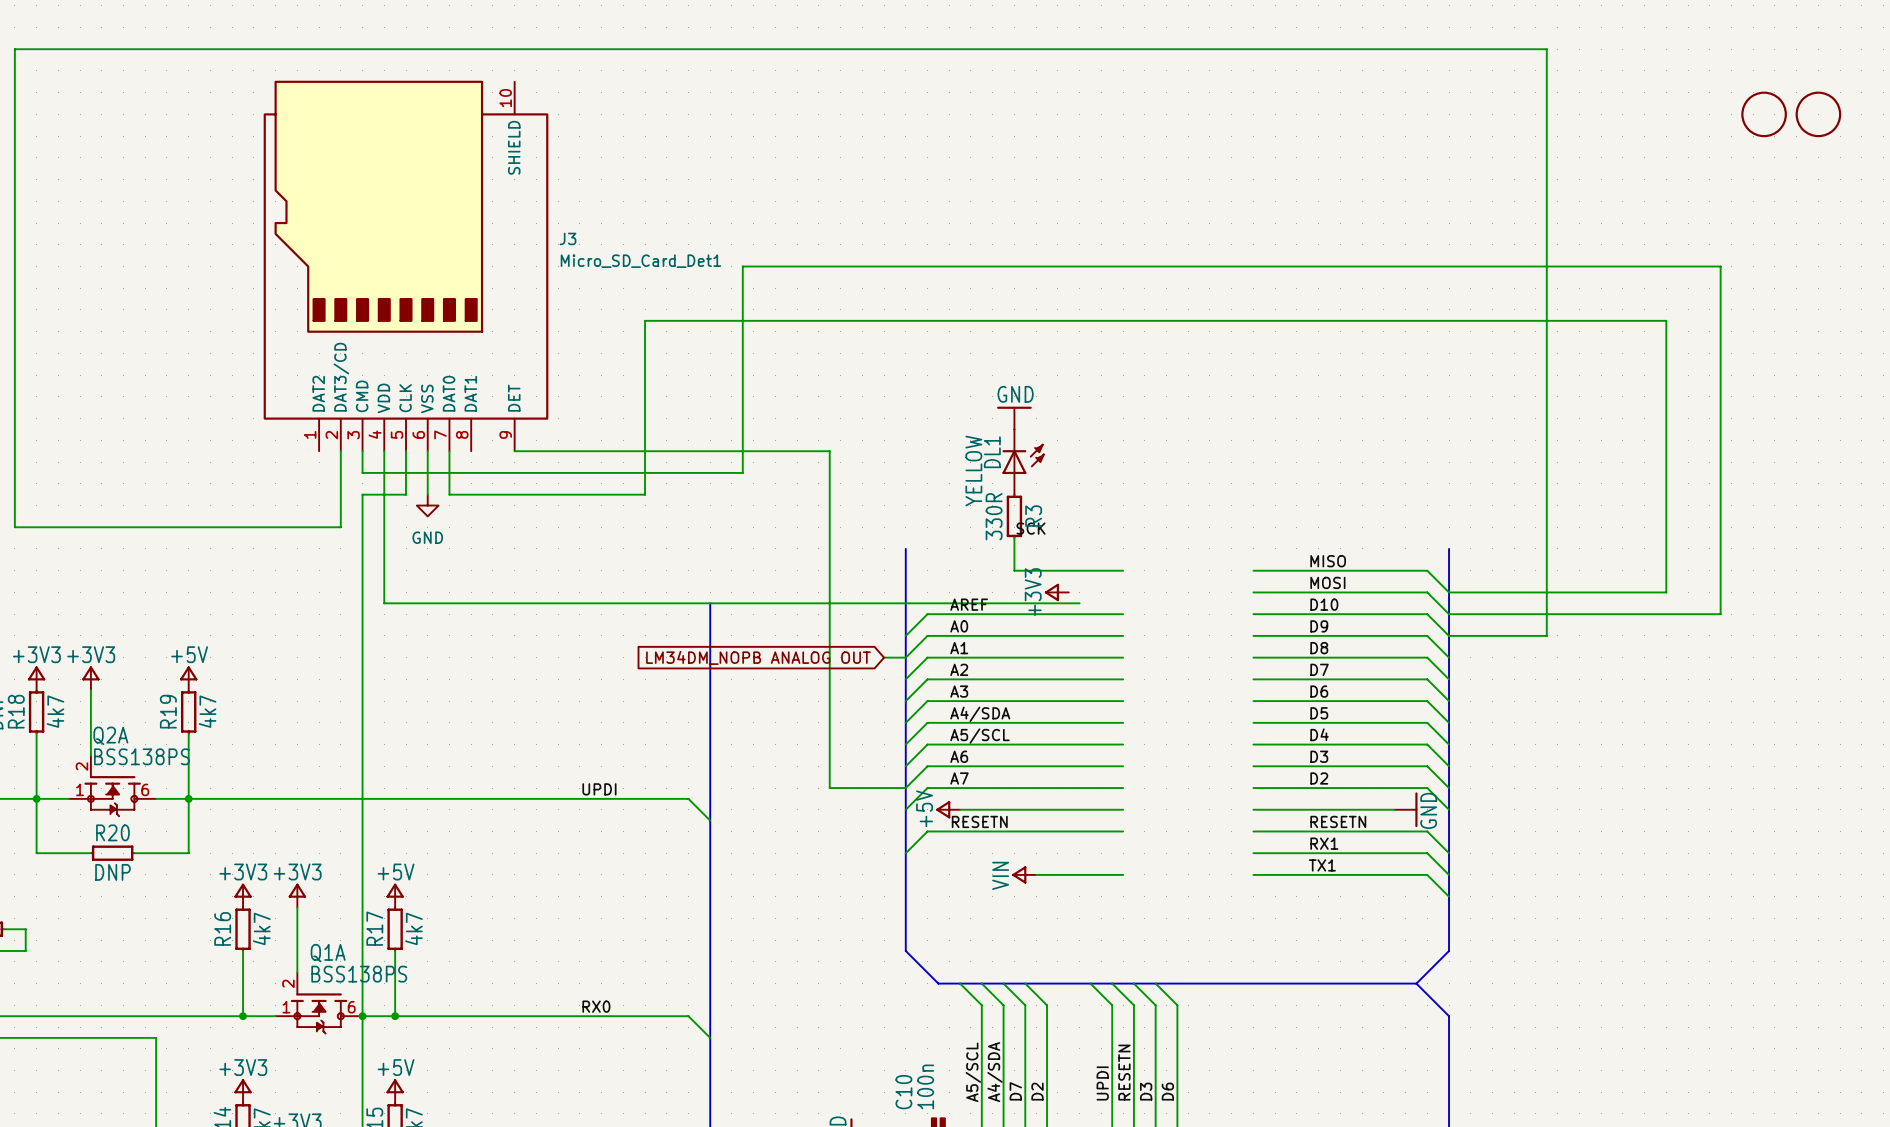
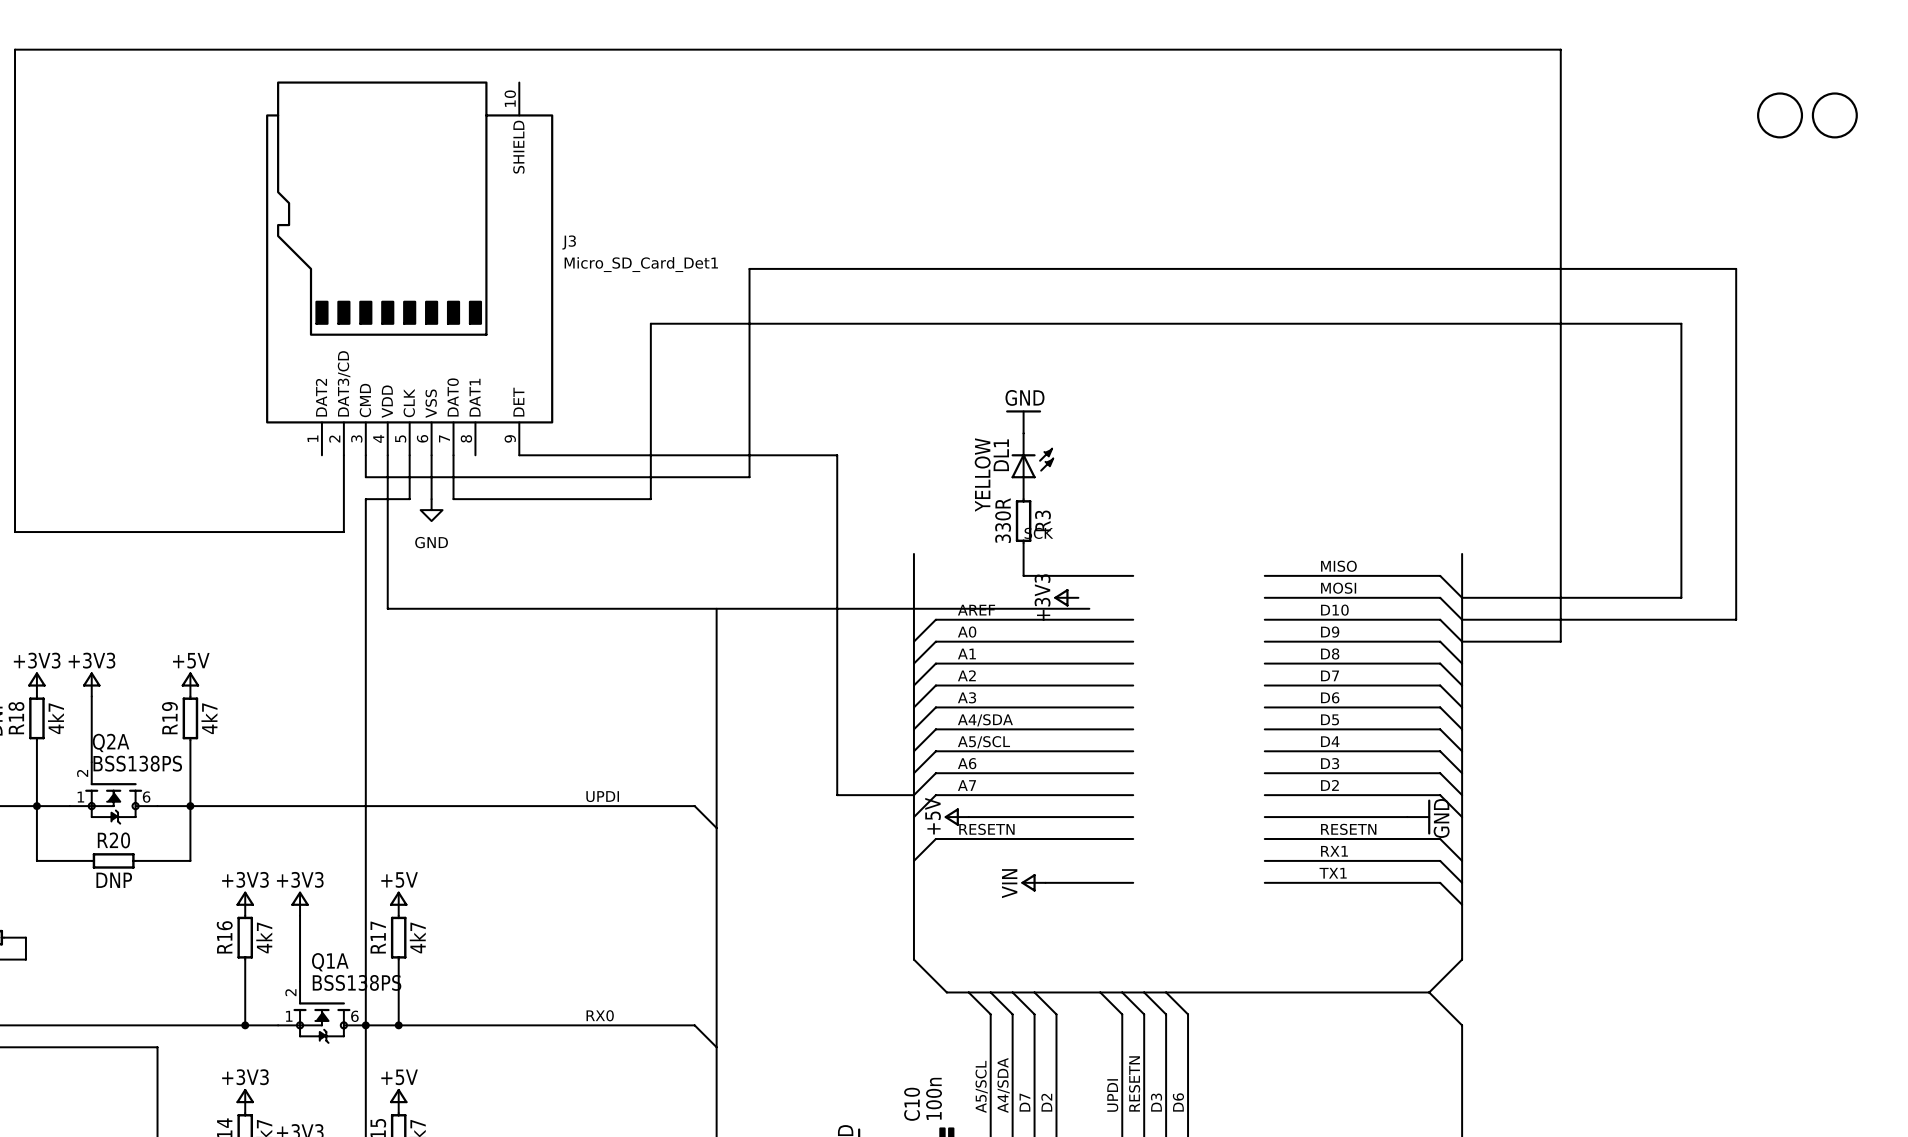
global label: LM34DM_NOPB ANALOG OUT (758, 657) -> none
wire: (884, 657) (905, 657) -> none

